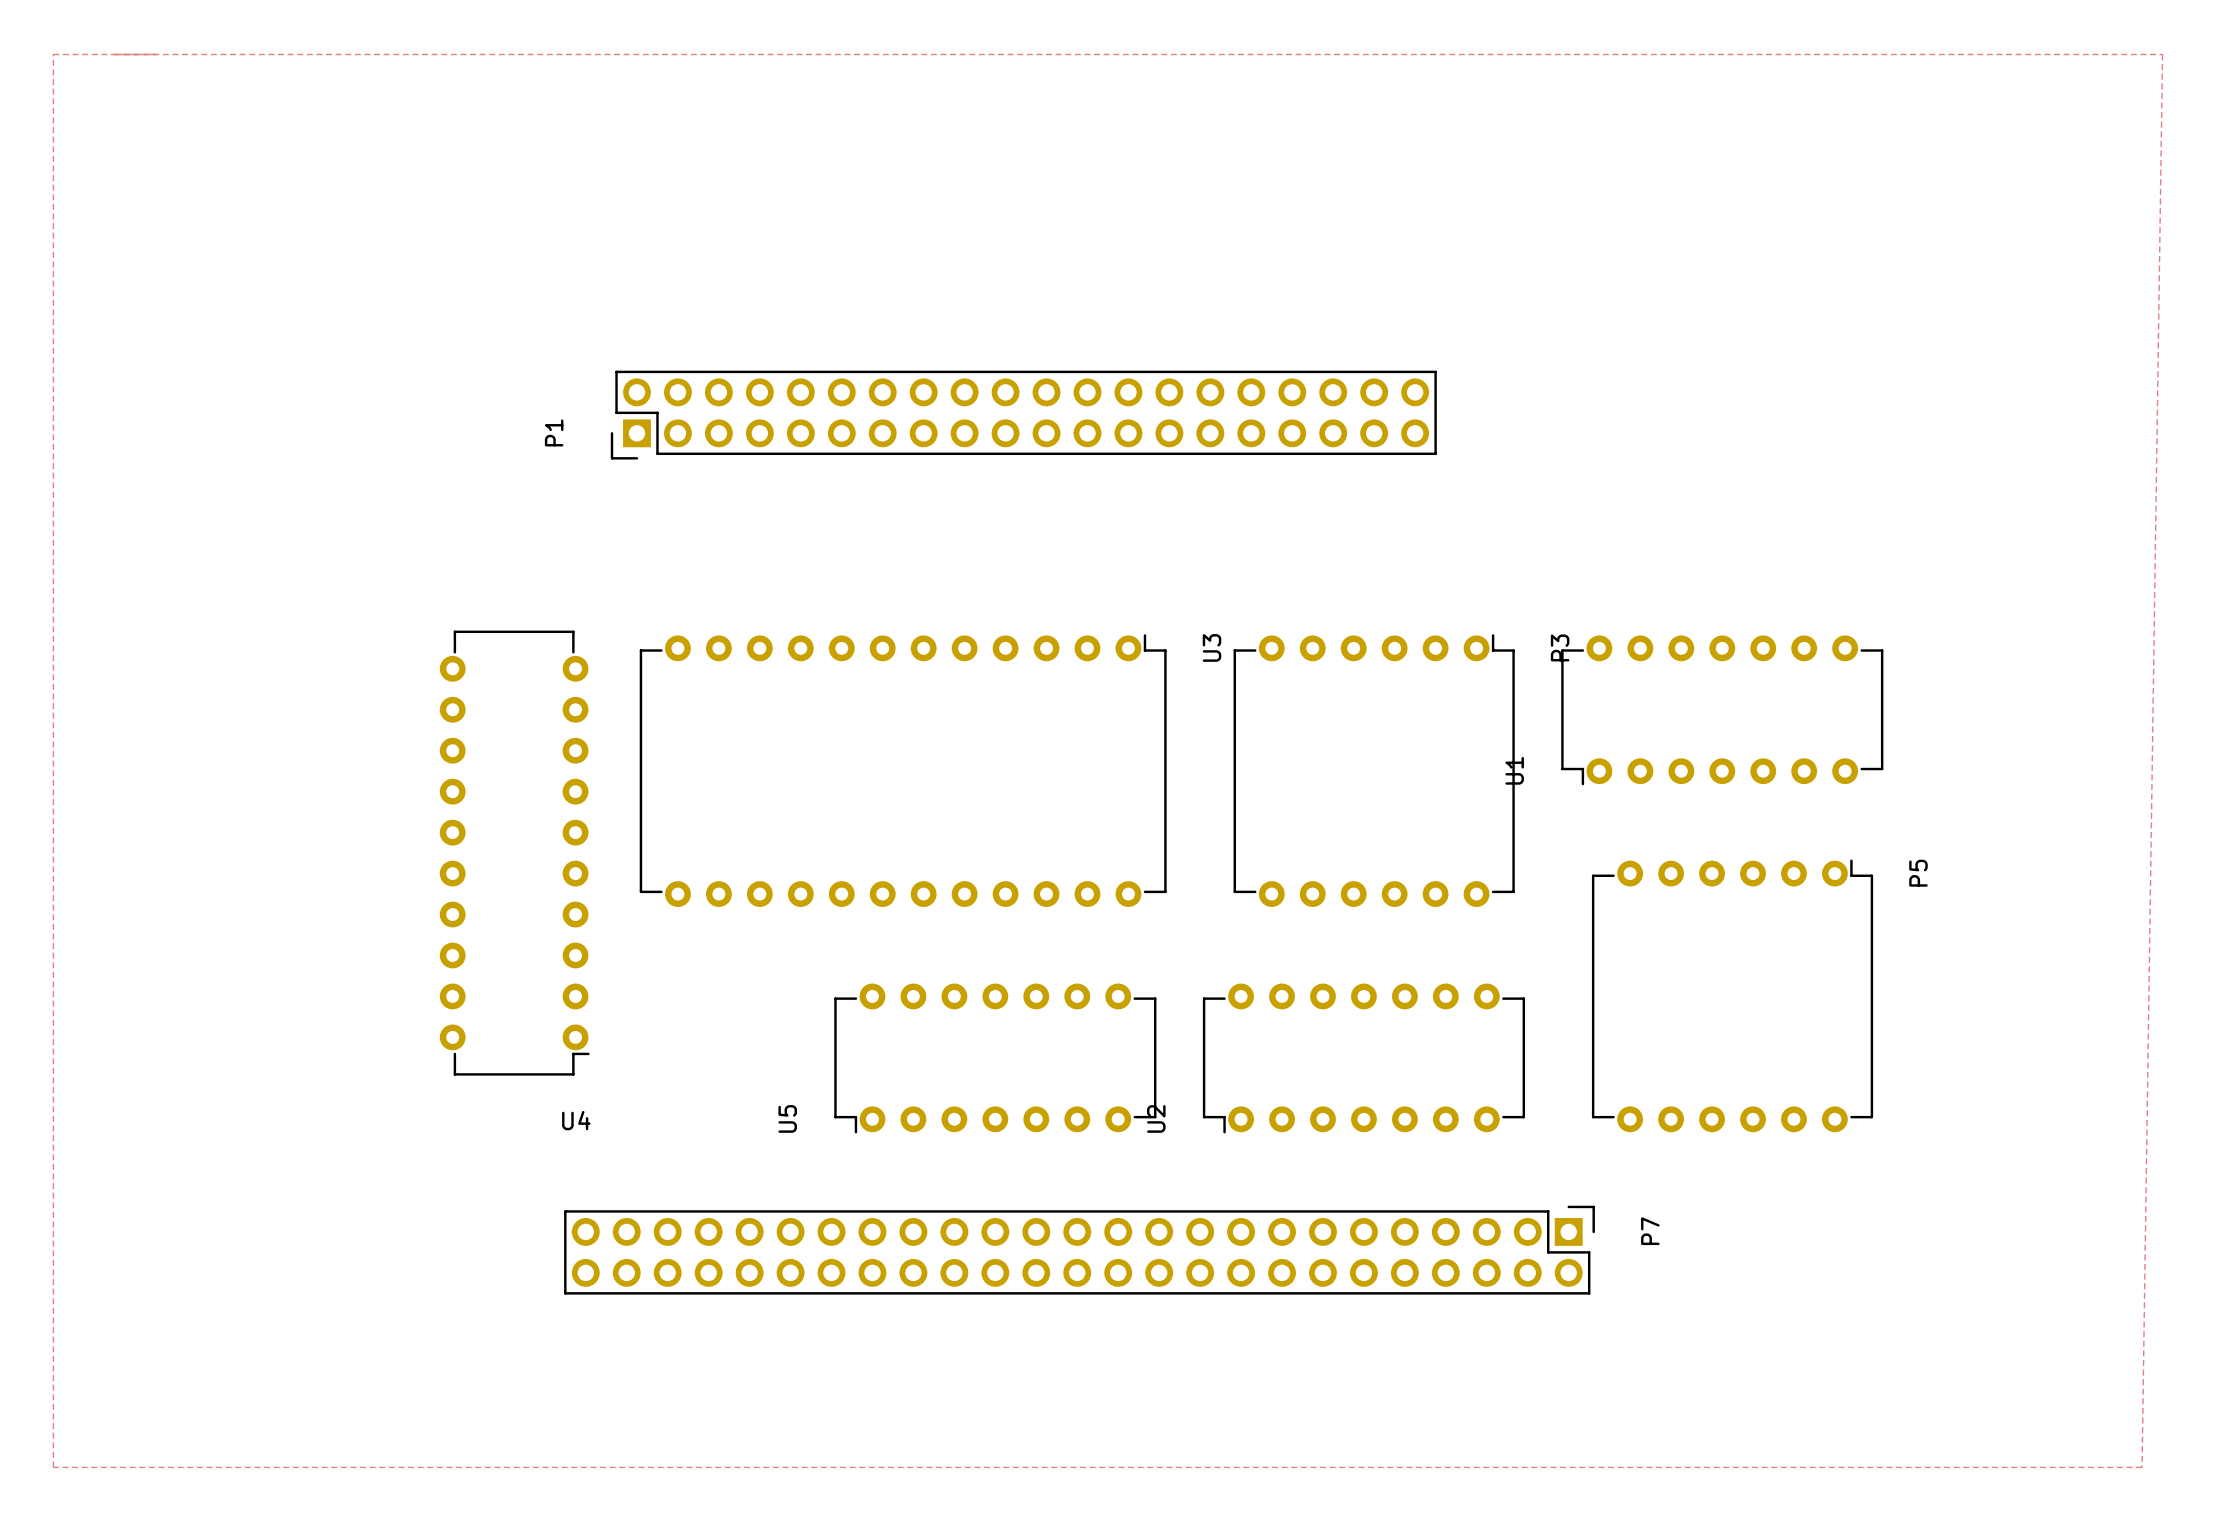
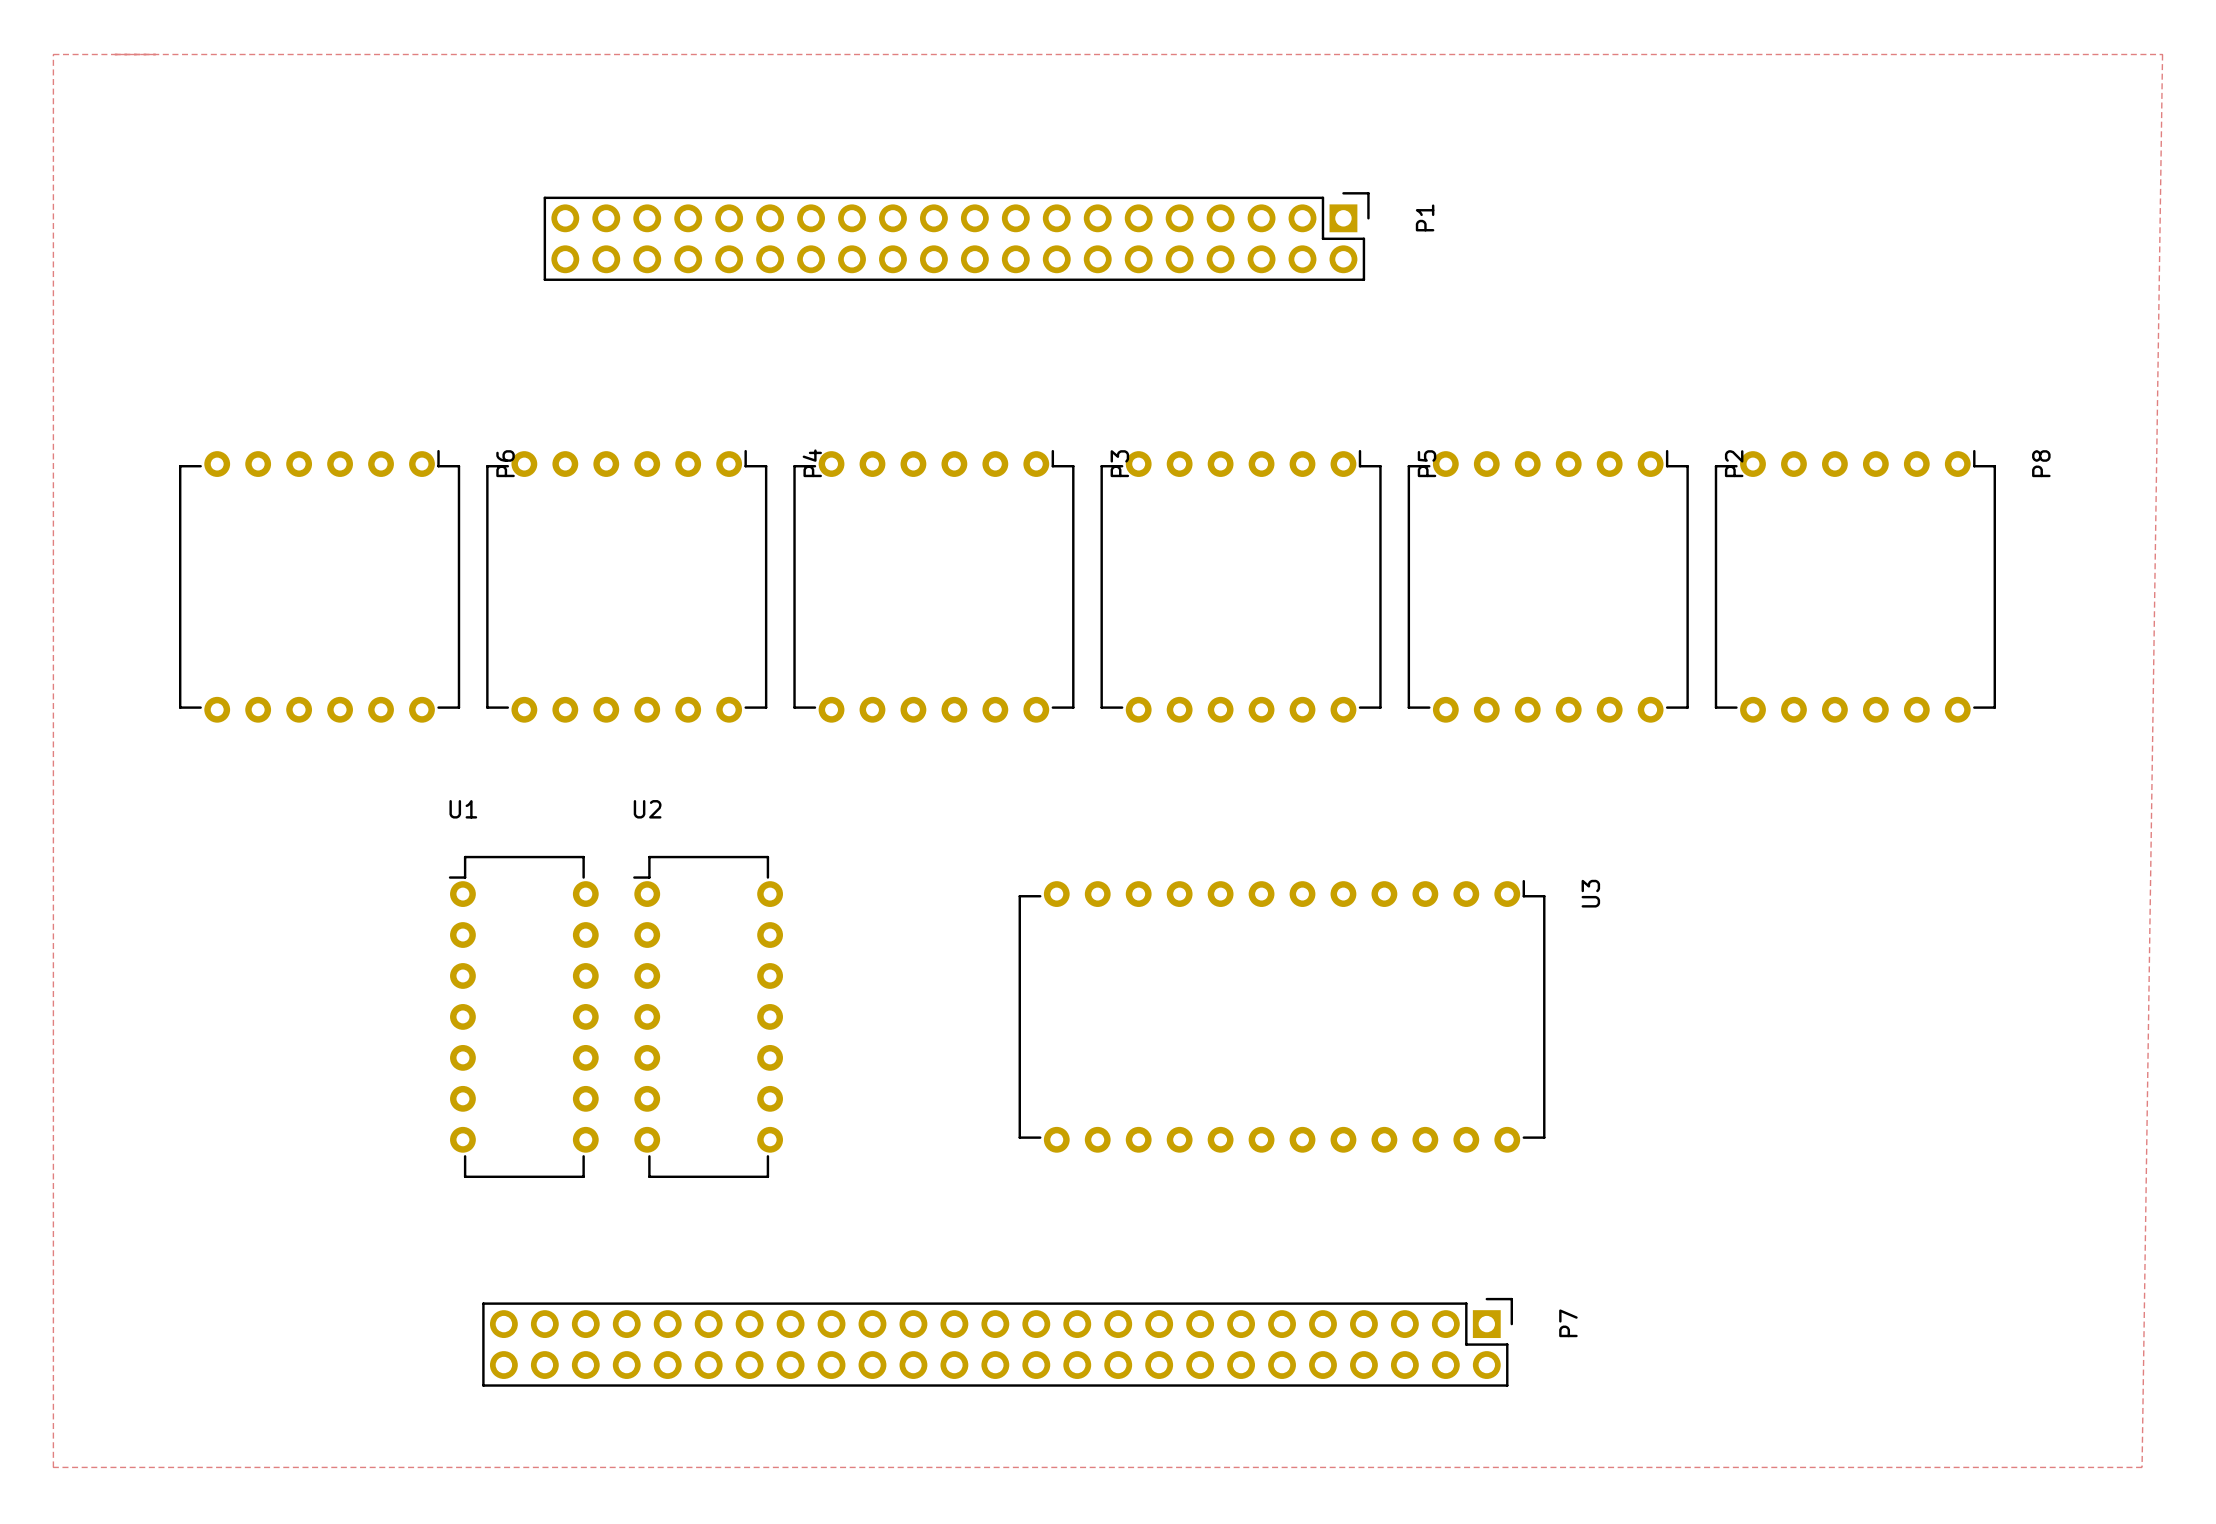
P1 rotation: 0° (1023, 415) -> 180° (956, 236)
P6: none -> (319, 586)
P4: none -> (626, 586)
P2: none -> (1548, 586)
P8: none -> (1855, 586)
U1 rotation: 0° (1722, 710) -> 90° clockwise (523, 1016)
U1 position: (1722, 710) -> (523, 1016)
U3 position: (903, 770) -> (1282, 1016)
P3 position: (1374, 770) -> (933, 586)
U4: (514, 853) -> none
P5 position: (1732, 995) -> (1241, 586)
U5: (995, 1058) -> none
U2 rotation: 0° (1363, 1058) -> 90° clockwise (708, 1016)
U2 position: (1363, 1058) -> (708, 1016)
P7 position: (1079, 1250) -> (997, 1342)

